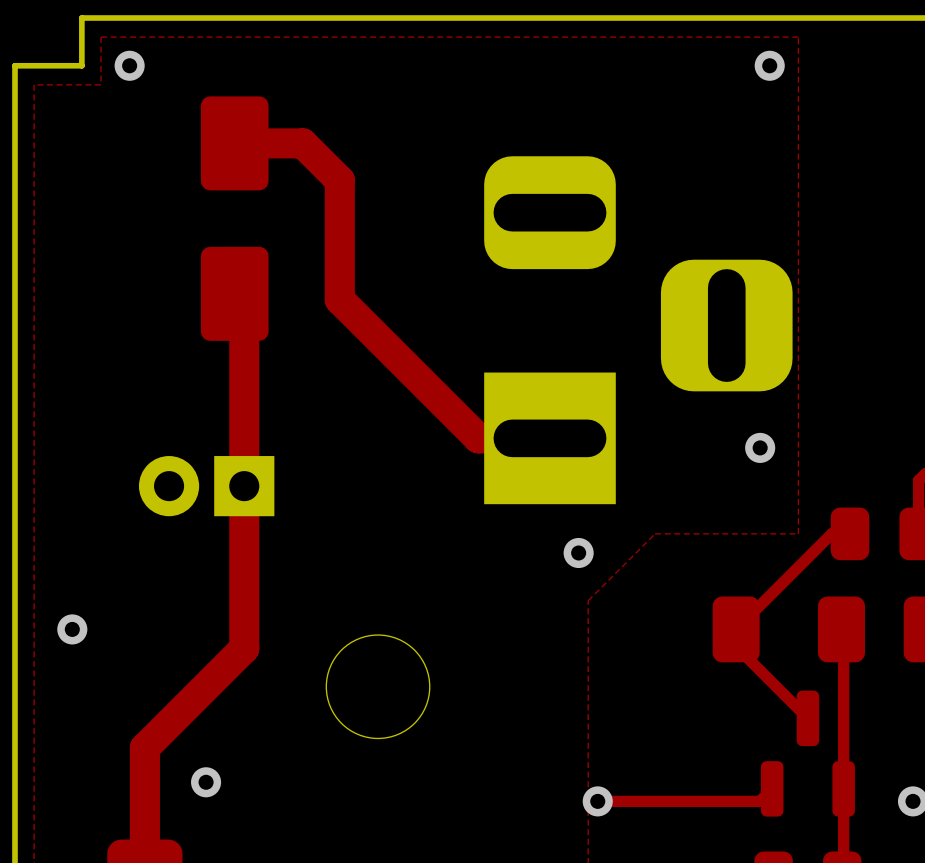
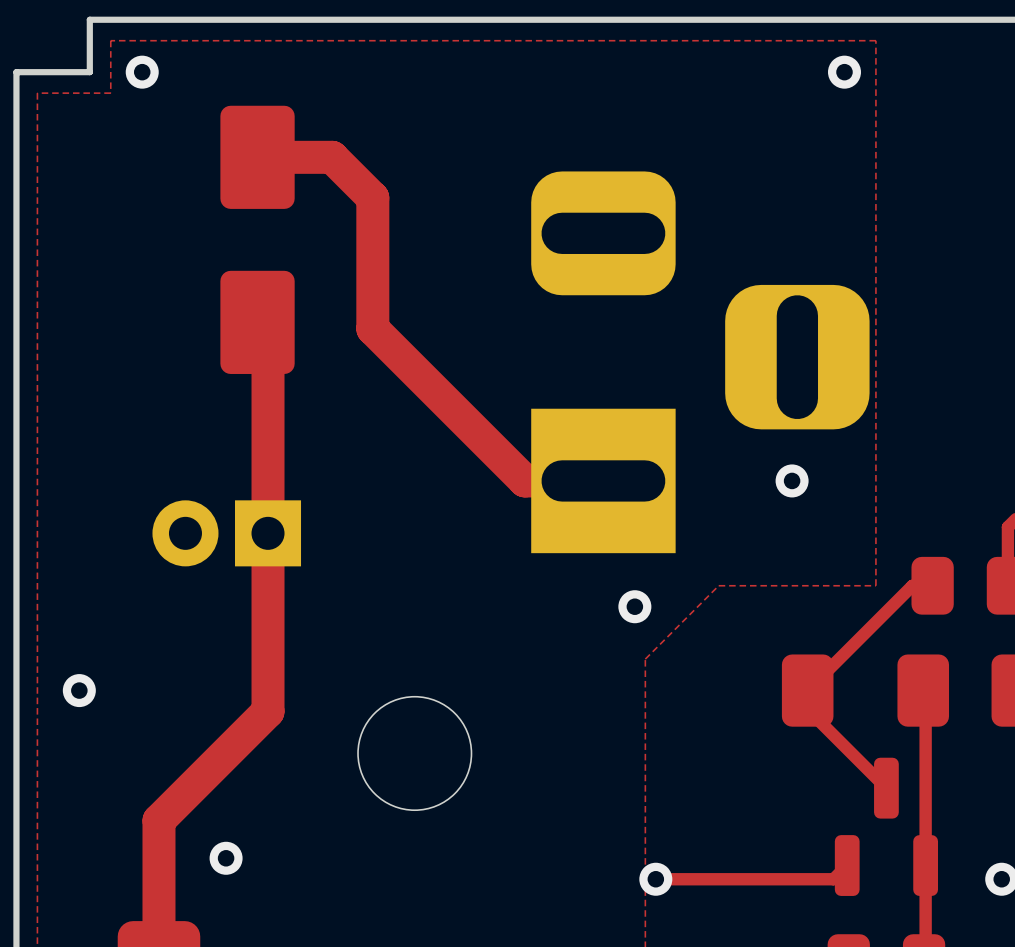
via position: (760, 447) -> (792, 480)

